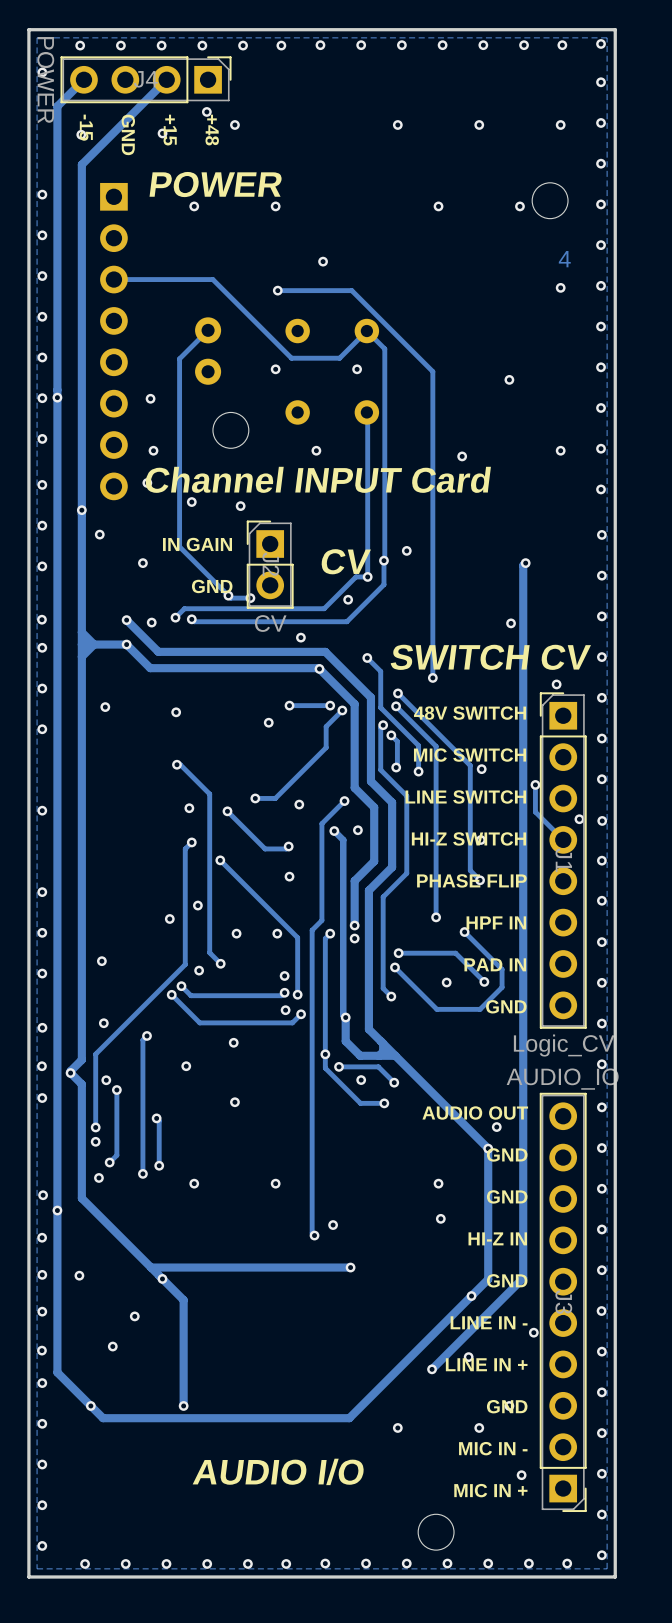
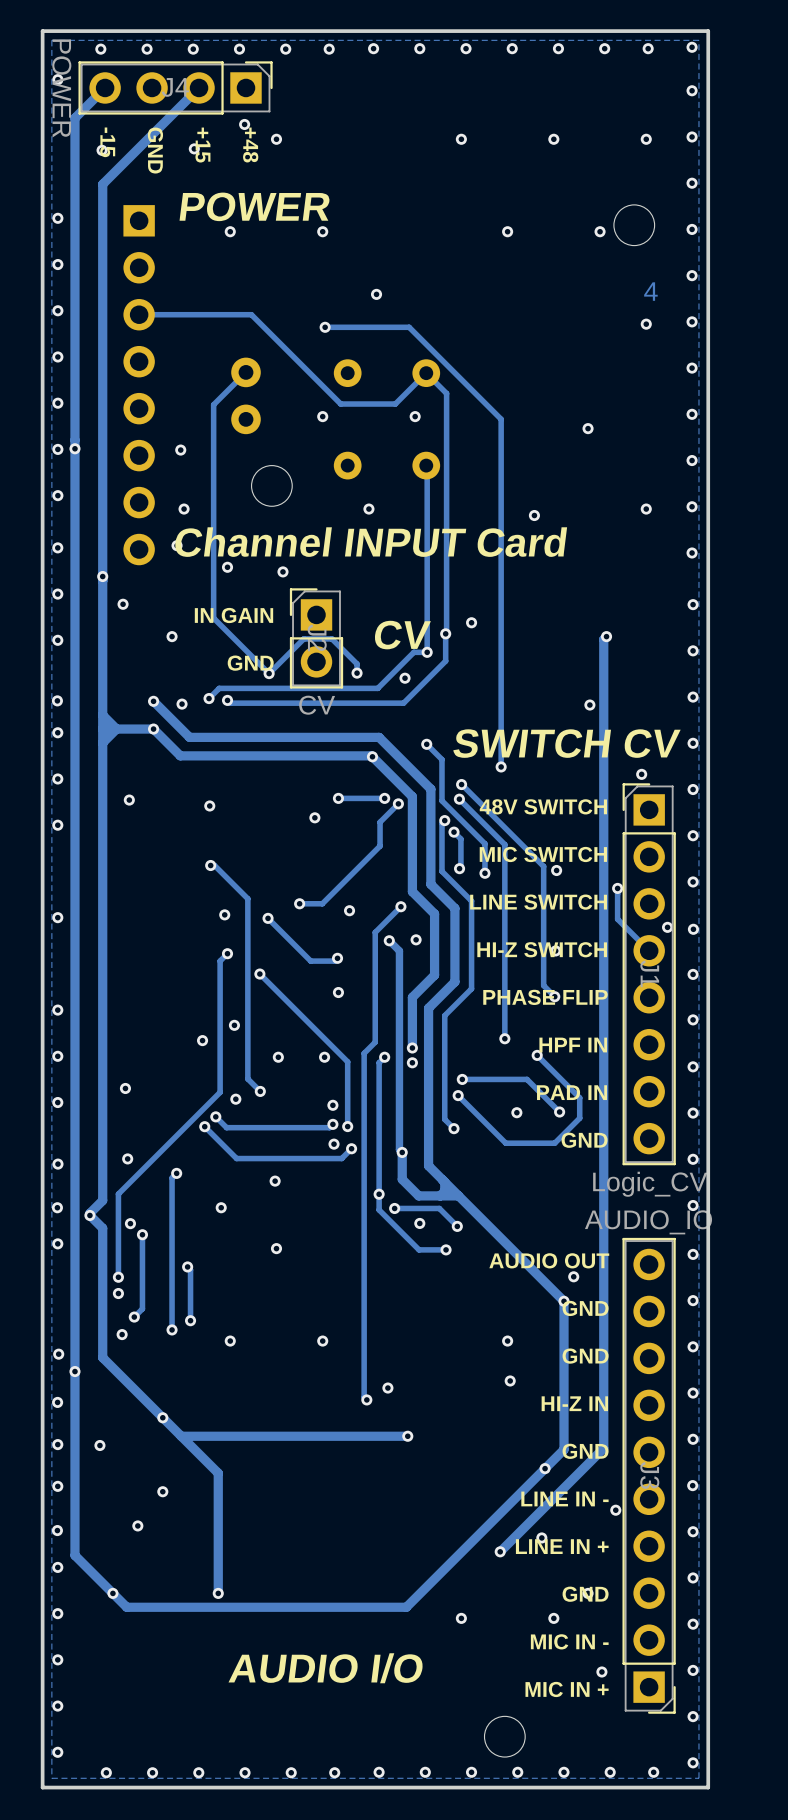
track: (228, 595) (230, 598) (250, 598) -> (269, 673) (303, 638) (331, 638) (357, 663) (357, 673)
via: none -> (357, 673)
via: (250, 598) -> none
via: (300, 637) -> none
via position: (162, 1278) -> (162, 1417)

